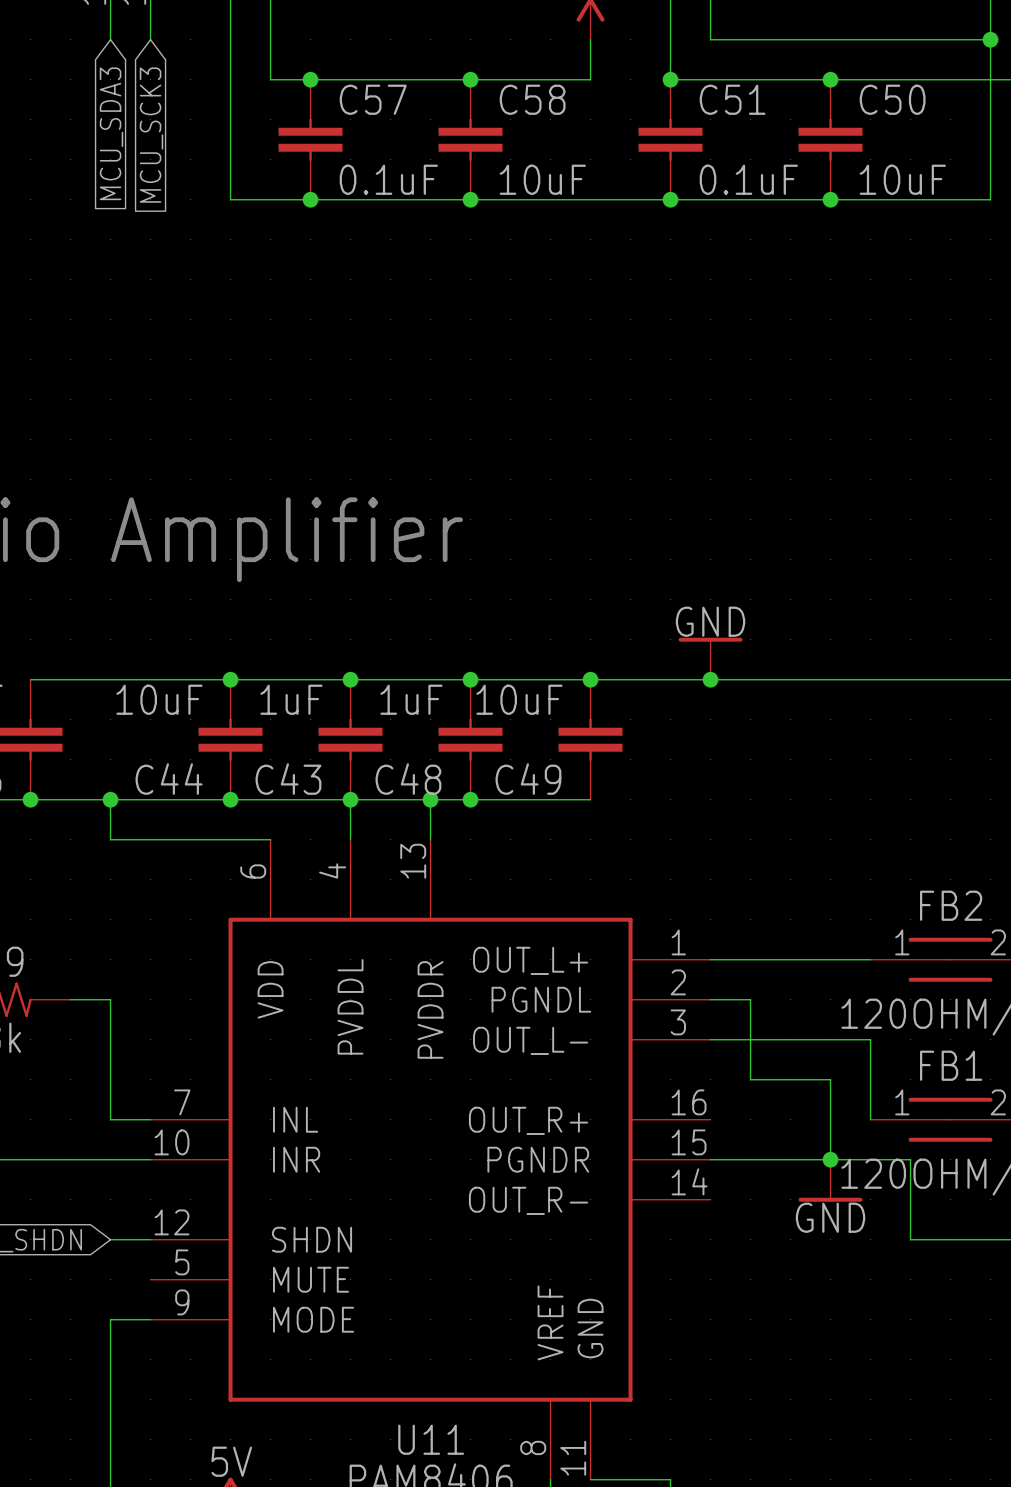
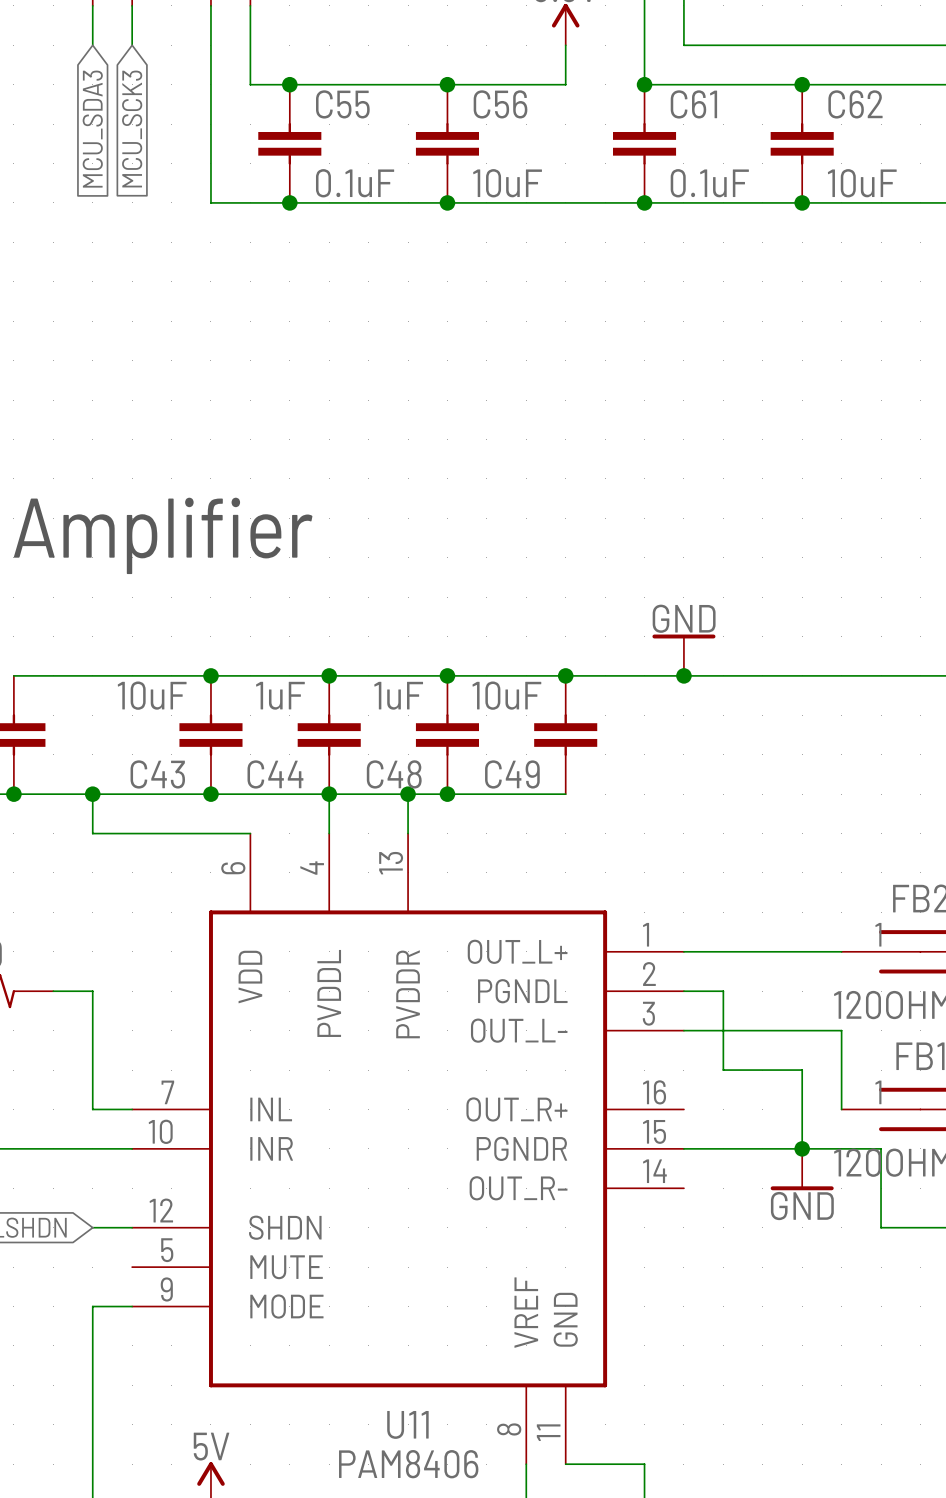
C57 name: C57 (373, 99) -> C55 (342, 104)
C58 name: C58 (532, 99) -> C56 (500, 104)
C51 name: C51 (732, 99) -> C61 (693, 104)
C50 name: C50 (892, 99) -> C62 (855, 104)
C44 name: C44 (169, 779) -> C43 (157, 774)
C43 name: C43 (288, 779) -> C44 (275, 774)

